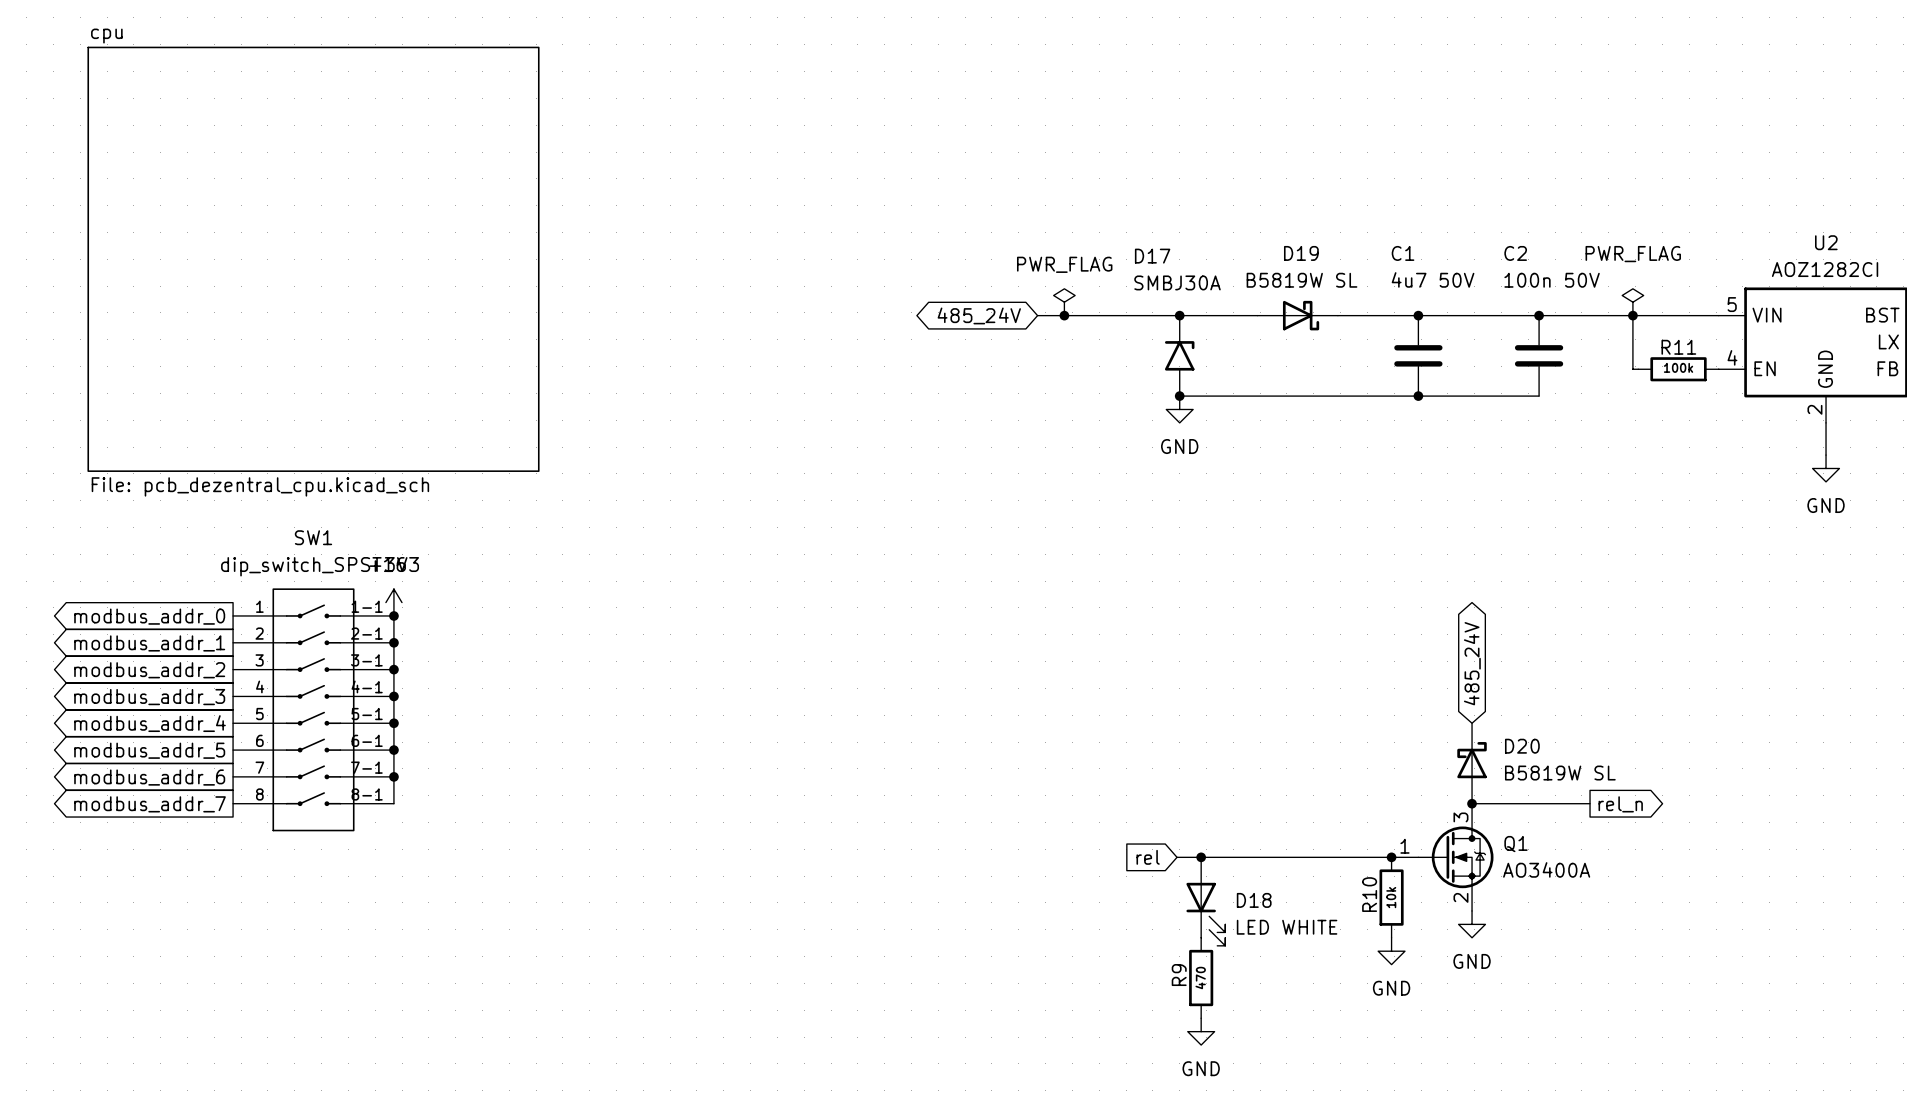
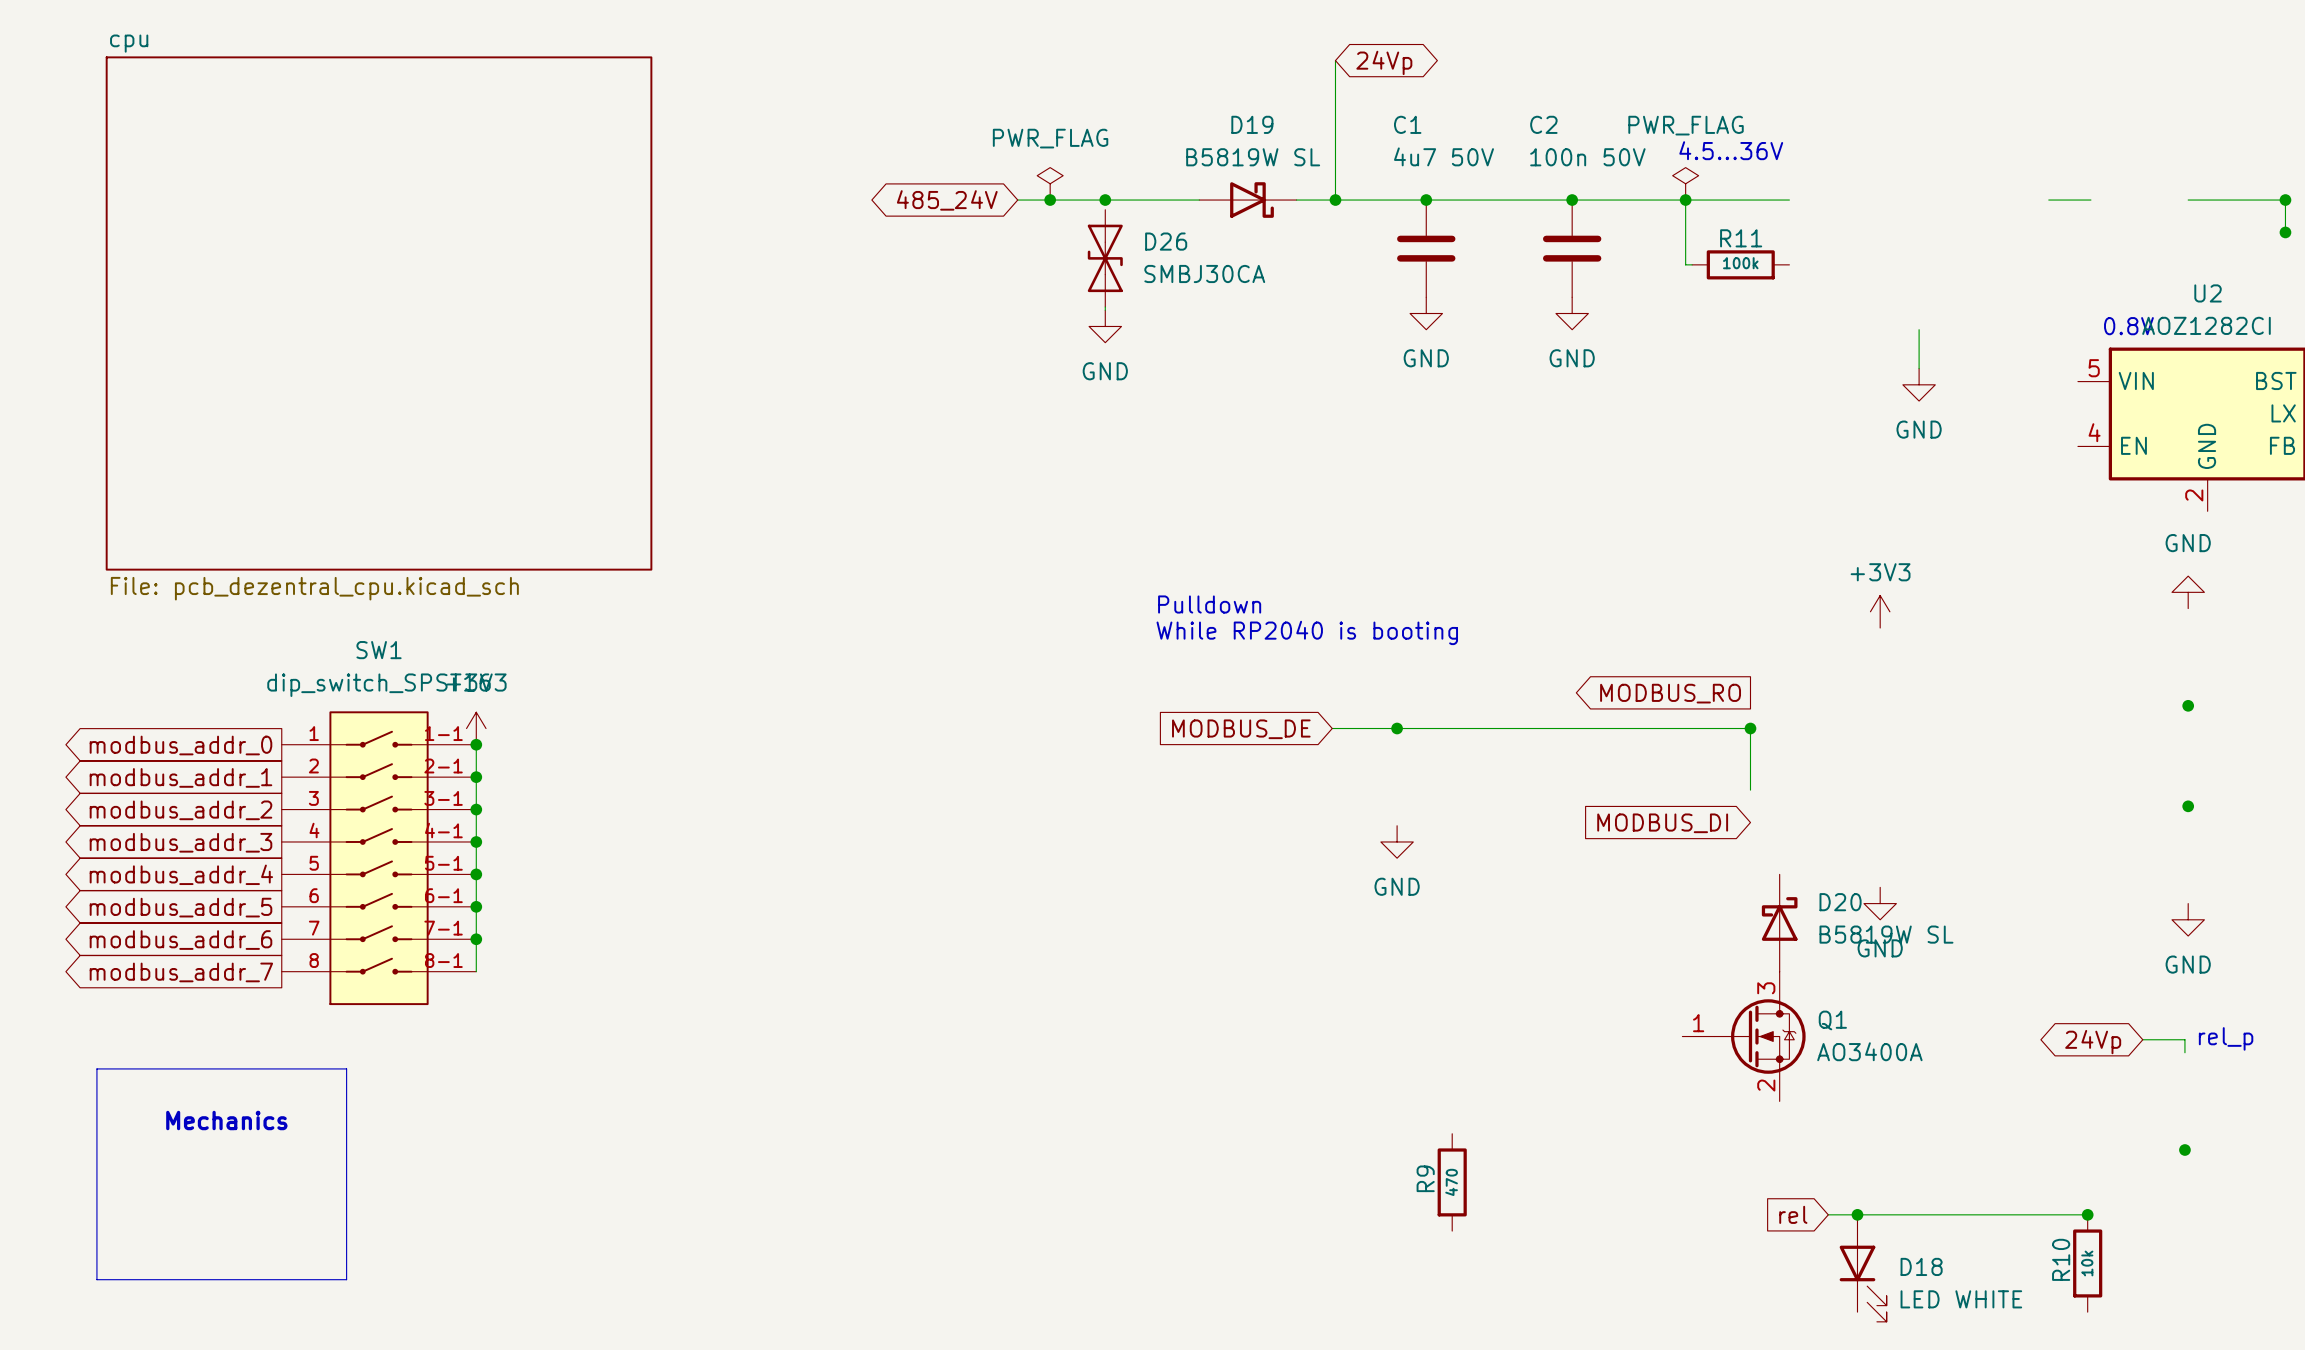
wire: none -> (1335, 60) (1335, 200)
global label: none -> 24Vp (1384, 62)
text: none -> 4.5...36V (1731, 150)
power symbol: none -> PWR_FLAG (1050, 183)
power symbol: none -> PWR_FLAG (1685, 183)
wire: none -> (1017, 200) (1199, 200)
junction: none -> (1050, 200)
junction: none -> (1105, 200)
wire: none -> (1296, 200) (1789, 200)
junction: none -> (1335, 200)
junction: none -> (1426, 200)
junction: none -> (1572, 200)
wire: none -> (1685, 200) (1685, 264) (1692, 264)
junction: none -> (1685, 200)
wire: none -> (2048, 200) (2090, 200)
wire: none -> (2188, 200) (2285, 200) (2285, 232)
junction: none -> (2285, 200)
junction: none -> (2285, 232)
D26: none -> SMBJ30CA (1105, 258)
wire: none -> (1105, 307) (1105, 310)
power symbol: none -> GND (1426, 313)
power symbol: none -> GND (1572, 313)
text: none -> 0.8V (2128, 326)
power symbol: none -> GND (1105, 326)
wire: none -> (1919, 329) (1919, 368)
power symbol: PWR_FLAG (1064, 302) -> none
power symbol: PWR_FLAG (1632, 302) -> none
global label position: 485_24V (979, 315) -> 485_24V (947, 200)
wire: (1037, 315) (1257, 315) -> none
junction: (1064, 315) -> none
junction: (1179, 315) -> none
D19 position: (1297, 315) -> (1247, 200)
wire: (1337, 315) (1718, 315) -> none
junction: (1418, 315) -> none
junction: (1539, 315) -> none
wire: (1632, 315) (1632, 369) (1638, 369) -> none
junction: (1632, 315) -> none
power symbol: none -> GND (1919, 384)
D17: SMBJ30A (1179, 355) -> none
C1 position: (1418, 355) -> (1426, 248)
C2 position: (1539, 355) -> (1572, 248)
R11 position: (1678, 369) -> (1740, 264)
wire: (1179, 396) (1539, 396) -> none
junction: (1179, 396) -> none
junction: (1418, 396) -> none
power symbol: GND (1179, 409) -> none
wire: (1826, 422) (1826, 455) -> none
power symbol rotation: 0° (1826, 468) -> 180° (2188, 592)
power symbol position: GND (1826, 468) -> GND (2188, 592)
text: none -> Pulldown (1209, 604)
power symbol: none -> +3V3 (1880, 611)
text: none -> While RP2040 is booting (1307, 632)
global label: none -> MODBUS_RO (1670, 693)
junction: none -> (2188, 705)
wire: none -> (1750, 725) (1750, 790)
wire: none -> (1332, 728) (1750, 728)
junction: none -> (1397, 728)
junction: none -> (1750, 728)
global label: none -> MODBUS_DE (1241, 729)
global label: 485_24V (1472, 663) -> none
junction: none -> (2188, 806)
global label: none -> MODBUS_DI (1662, 823)
power symbol: none -> GND (1397, 841)
power symbol: none -> GND (1880, 903)
power symbol: none -> GND (2188, 919)
wire: (1472, 803) (1590, 803) -> none
junction: (1472, 803) -> none
global label: rel_n (1620, 804) -> none
global label: rel (1148, 857) -> none
wire: (1177, 857) (1391, 857) -> none
junction: (1201, 857) -> none
junction: (1391, 857) -> none
text: none -> rel_p (2226, 1038)
wire: none -> (2142, 1039) (2184, 1039) (2184, 1052)
global label: none -> 24Vp (2093, 1042)
line: none -> (96, 1068) (346, 1068) (346, 1279) (96, 1279) (96, 1068)
R10 position: (1391, 897) -> (2087, 1263)
D18 position: (1205, 901) -> (1863, 1268)
power symbol: GND (1472, 924) -> none
text: none -> Mechanics (226, 1120)
power symbol: GND (1391, 951) -> none
junction: none -> (2184, 1150)
global label: none -> rel (1793, 1214)
wire: none -> (1828, 1214) (2087, 1214)
junction: none -> (1857, 1214)
junction: none -> (2087, 1214)
power symbol: GND (1201, 1031) -> none

